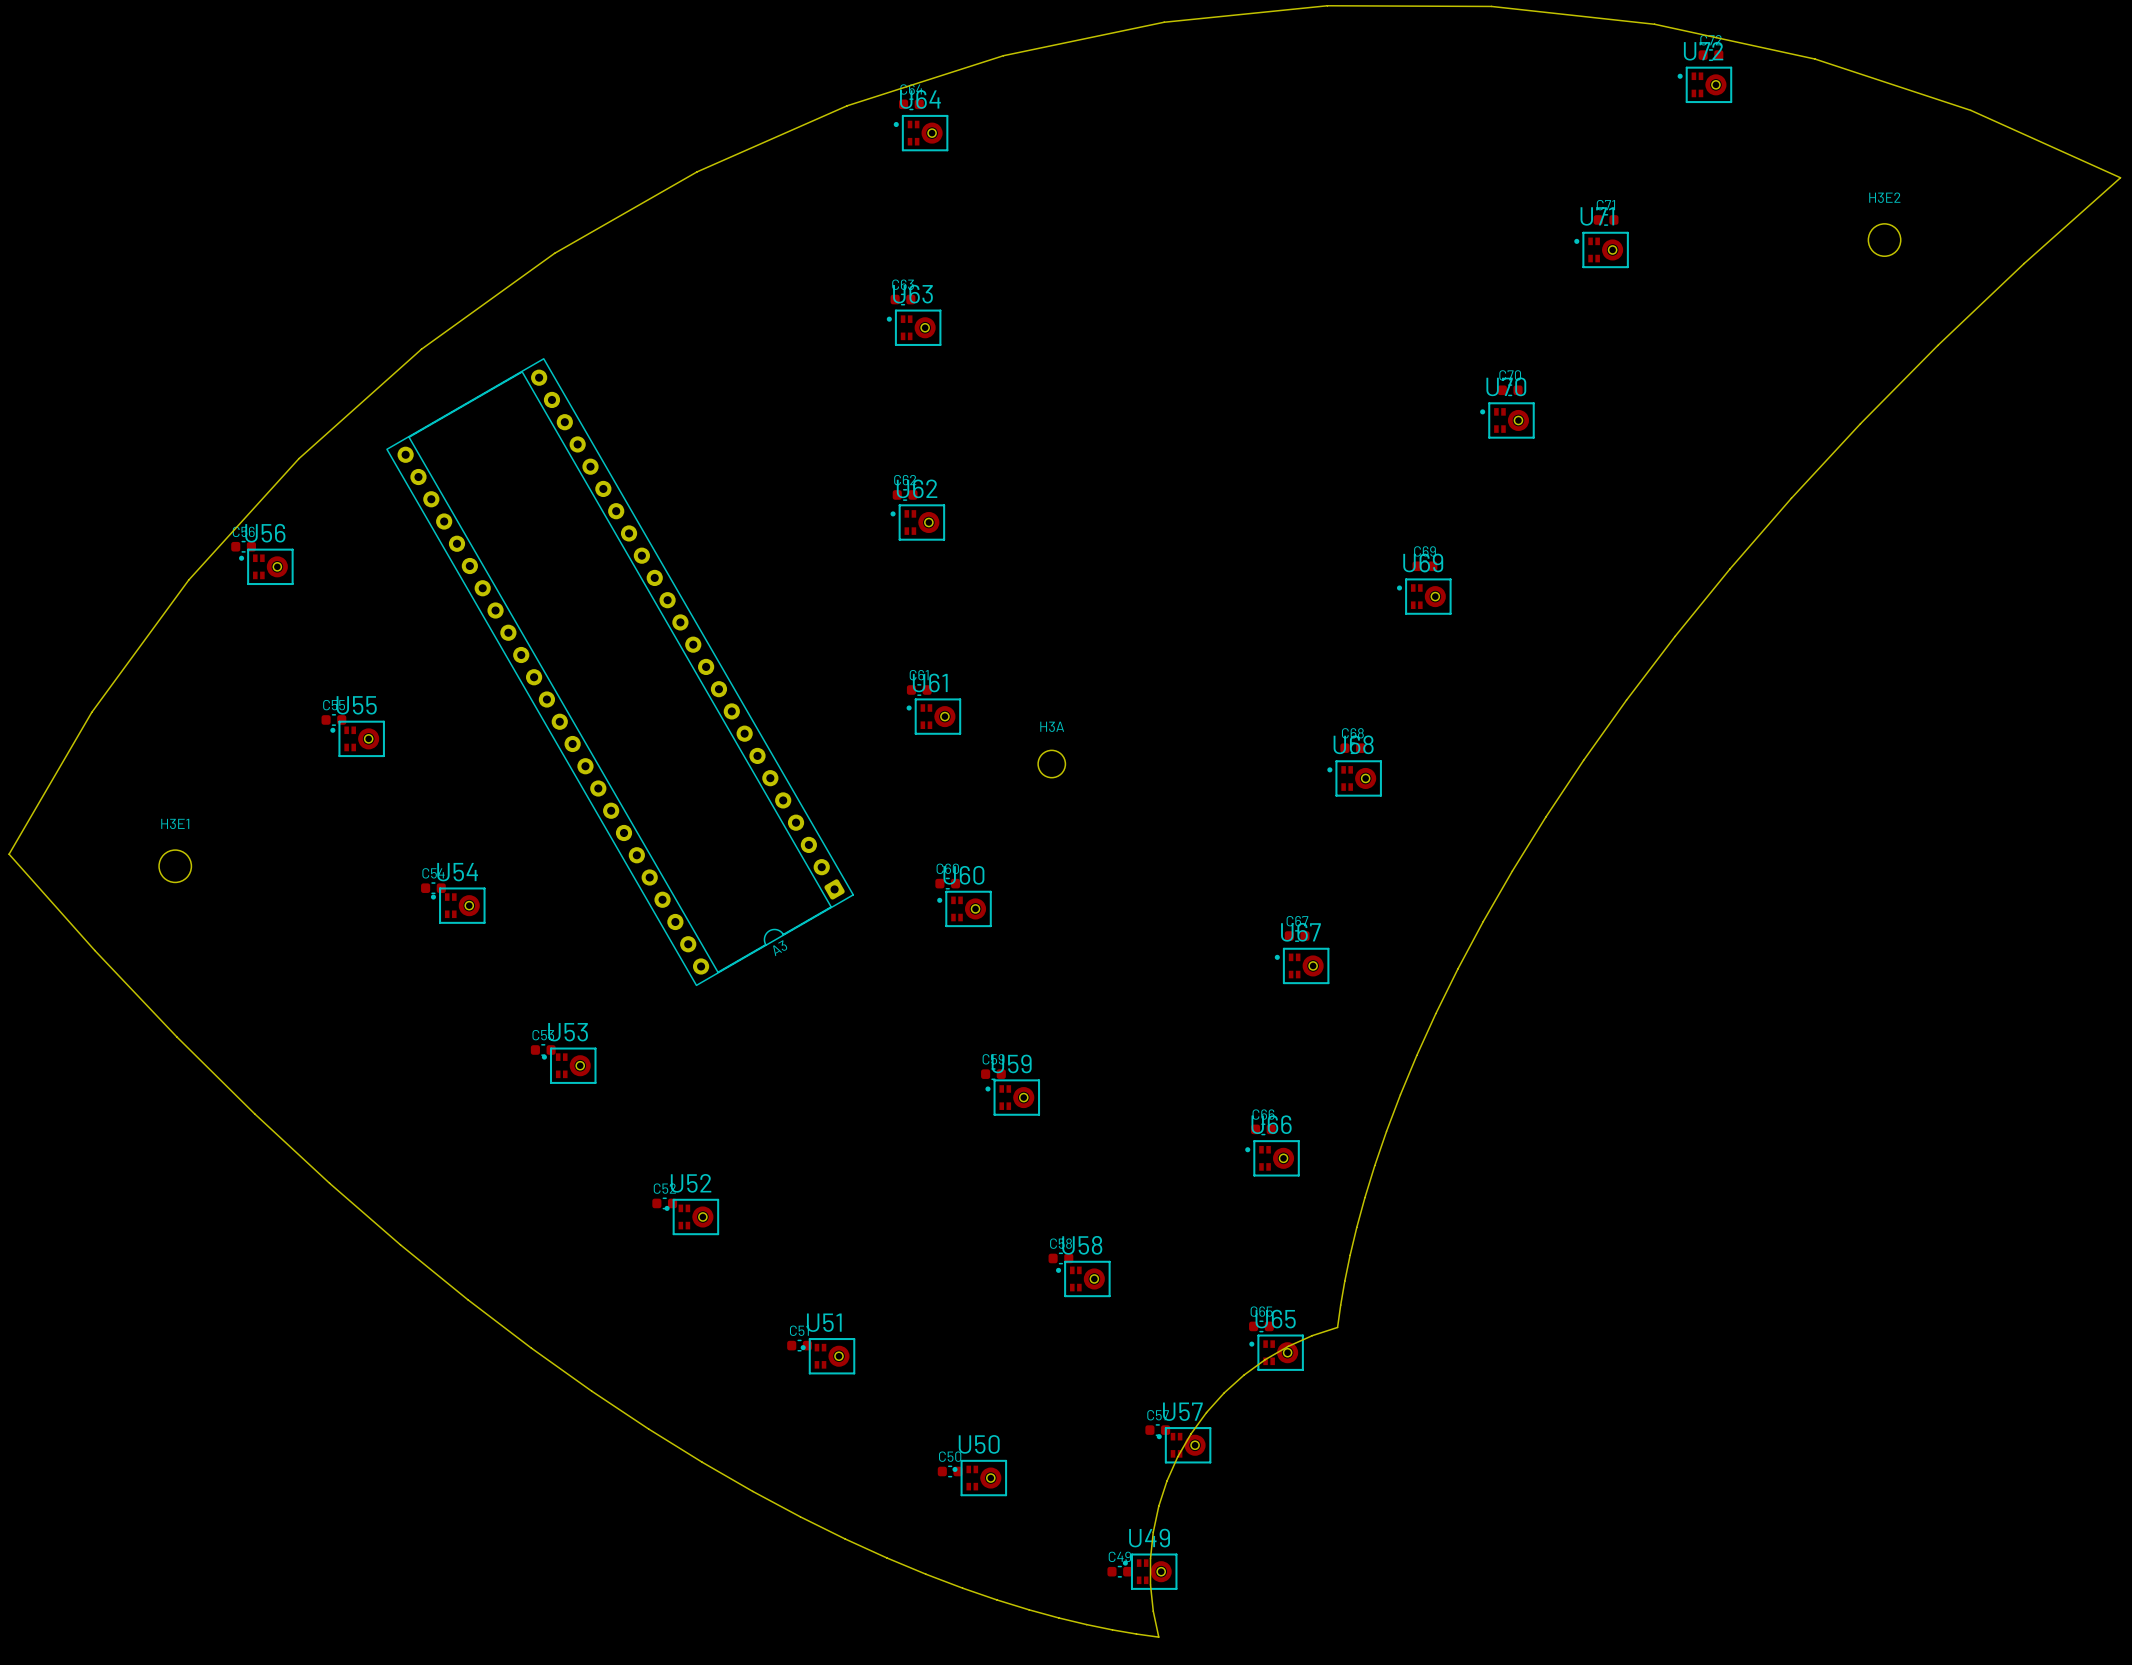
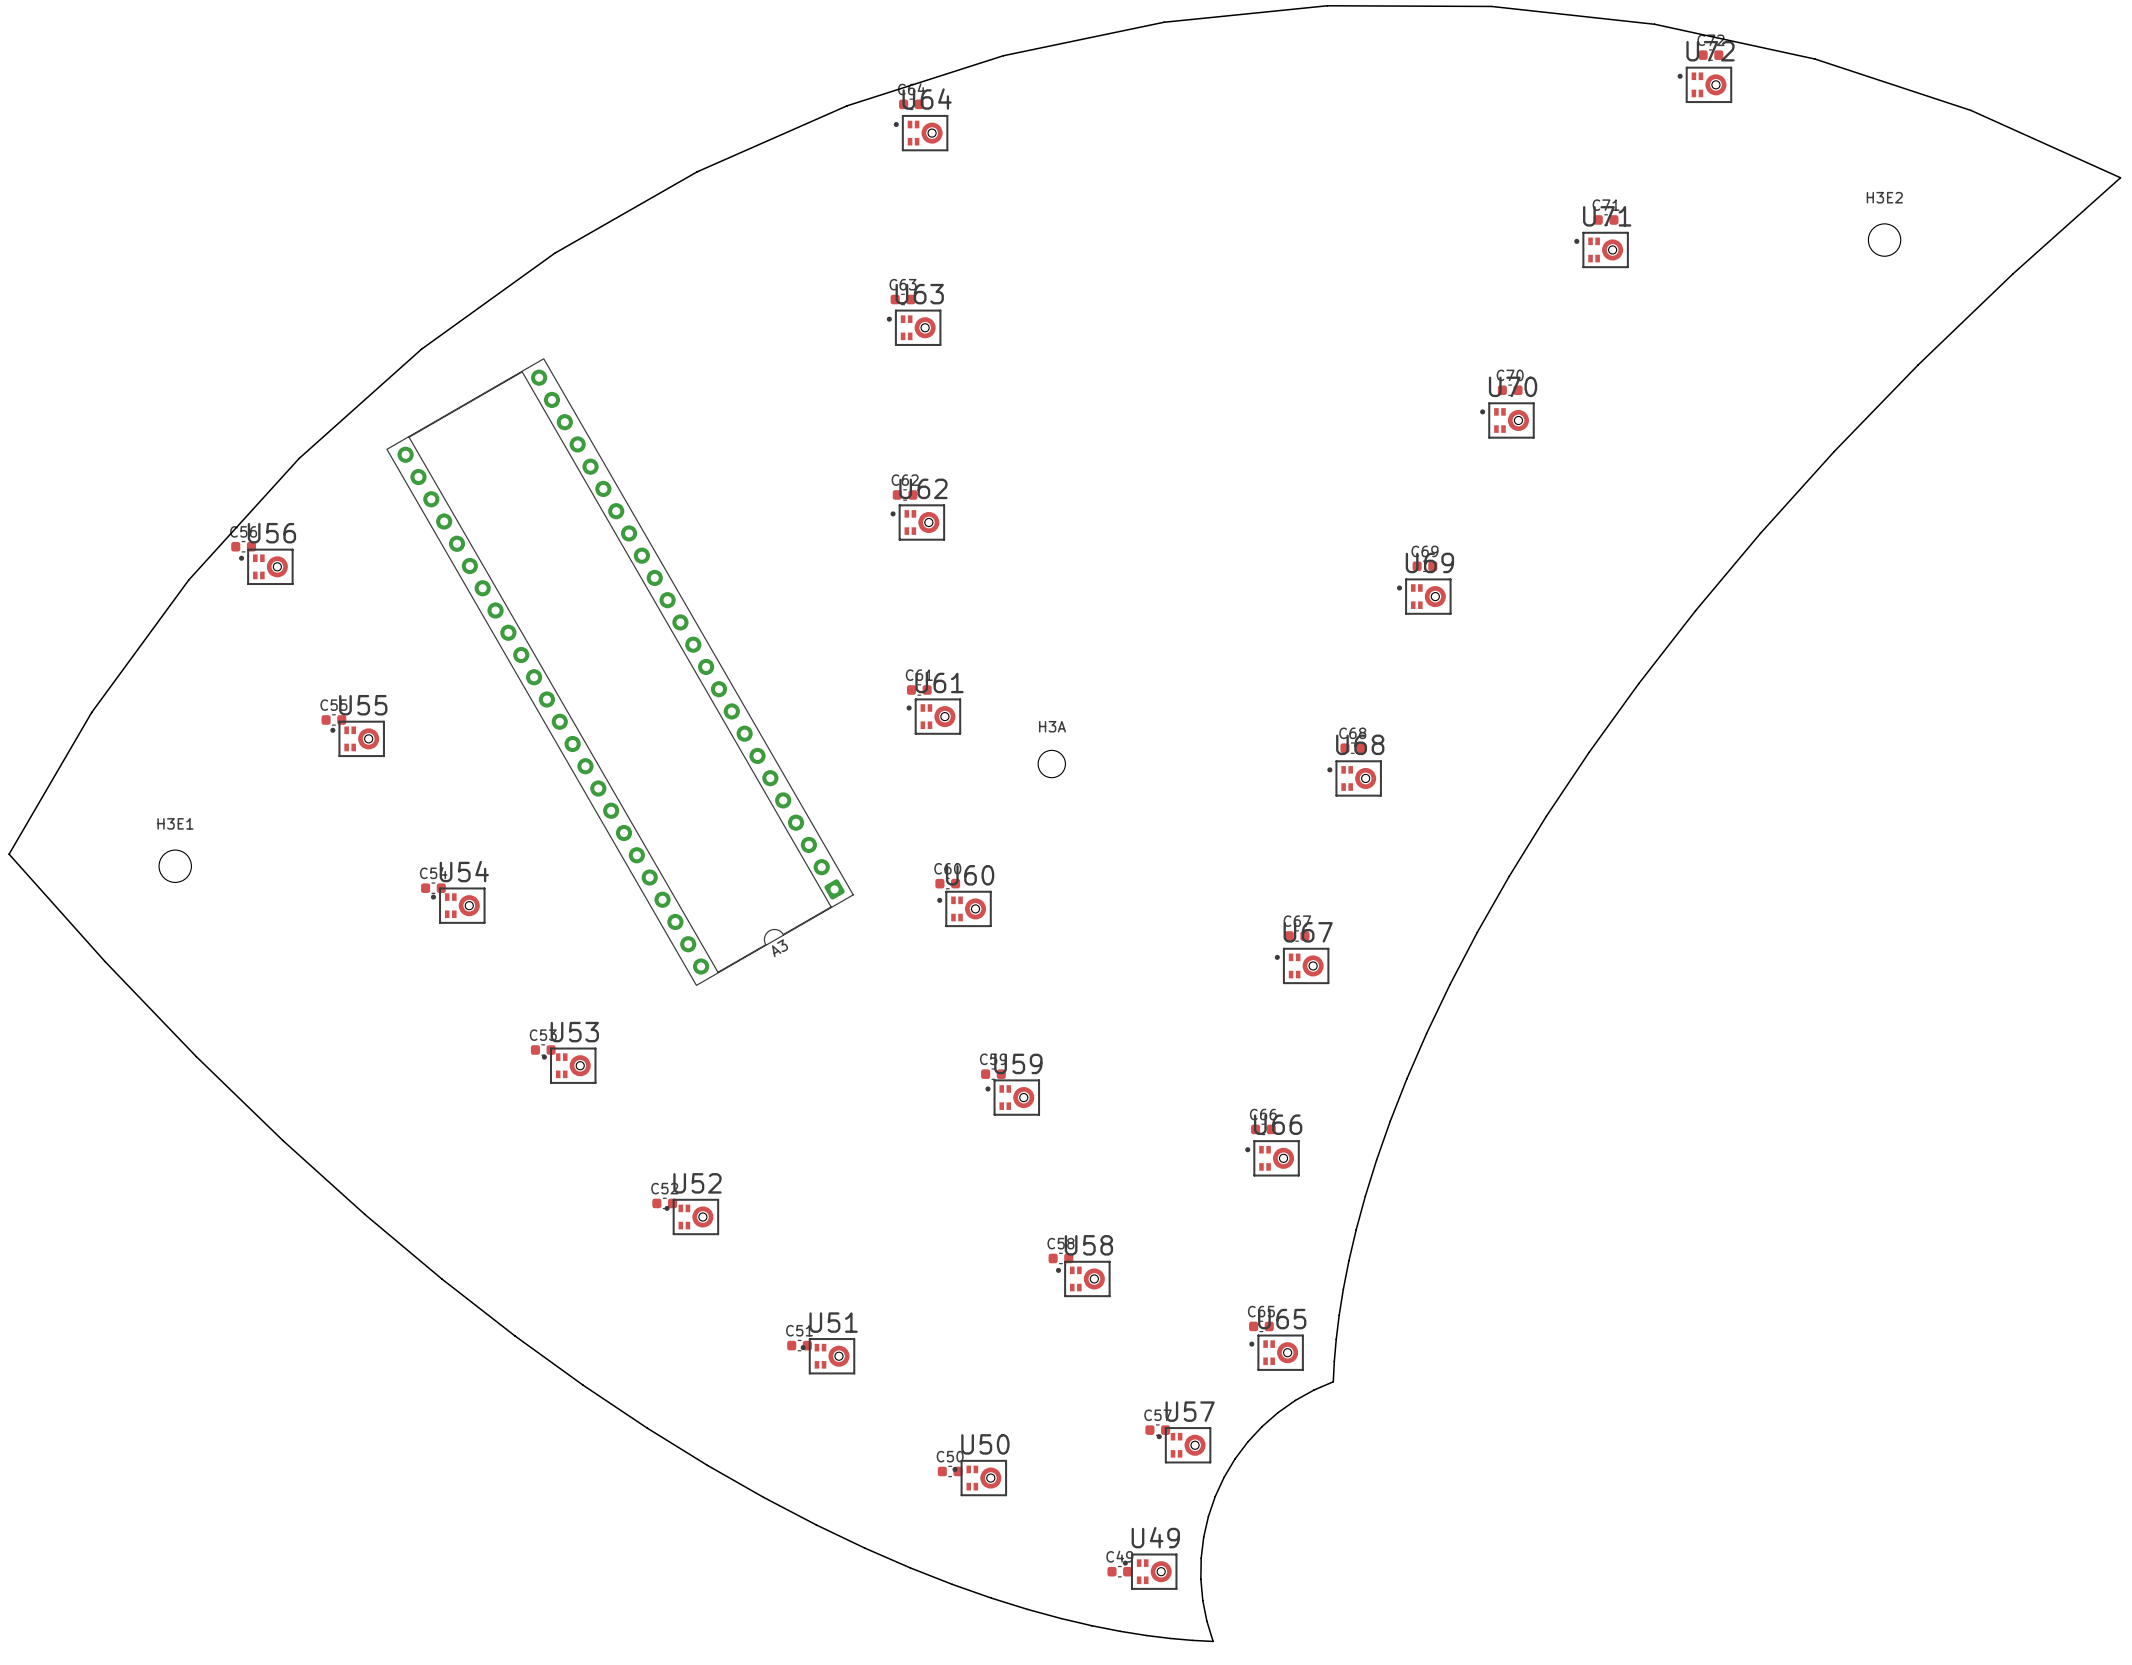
board edge: (2120, 177) (2024, 263) (1937, 345) (1860, 423) (1791, 498) (1675, 636) (1626, 700) (1545, 817) (1512, 871) (1457, 969) (1435, 1013) (1400, 1094) (1374, 1165) (1356, 1227) (1344, 1281) (1337, 1327) (1288, 1346) (1243, 1375) (1206, 1412) (1177, 1456) (1158, 1506) (1150, 1558) (1153, 1611) (1158, 1637) (1086, 1624) (1029, 1609) (962, 1588) (886, 1557) (800, 1516) (752, 1491) (648, 1429) (591, 1391) (467, 1299) (329, 1183) (255, 1114) (176, 1036) (94, 950) (9, 854) -> (2120, 177) (2013, 273) (1918, 364) (1834, 451) (1760, 533) (1695, 610) (1638, 683) (1546, 816) (1509, 876) (1449, 984) (1426, 1033) (1390, 1121) (1365, 1196) (1348, 1260) (1339, 1315) (1333, 1381) (1295, 1400) (1262, 1426) (1234, 1459) (1215, 1496) (1203, 1537) (1200, 1579) (1202, 1600) (1213, 1641) (1146, 1635) (1091, 1625) (1027, 1609) (952, 1584) (864, 1548) (816, 1524) (707, 1465) (647, 1428) (514, 1335) (442, 1279) (364, 1214) (282, 1140) (196, 1056) (105, 961) (9, 854)

